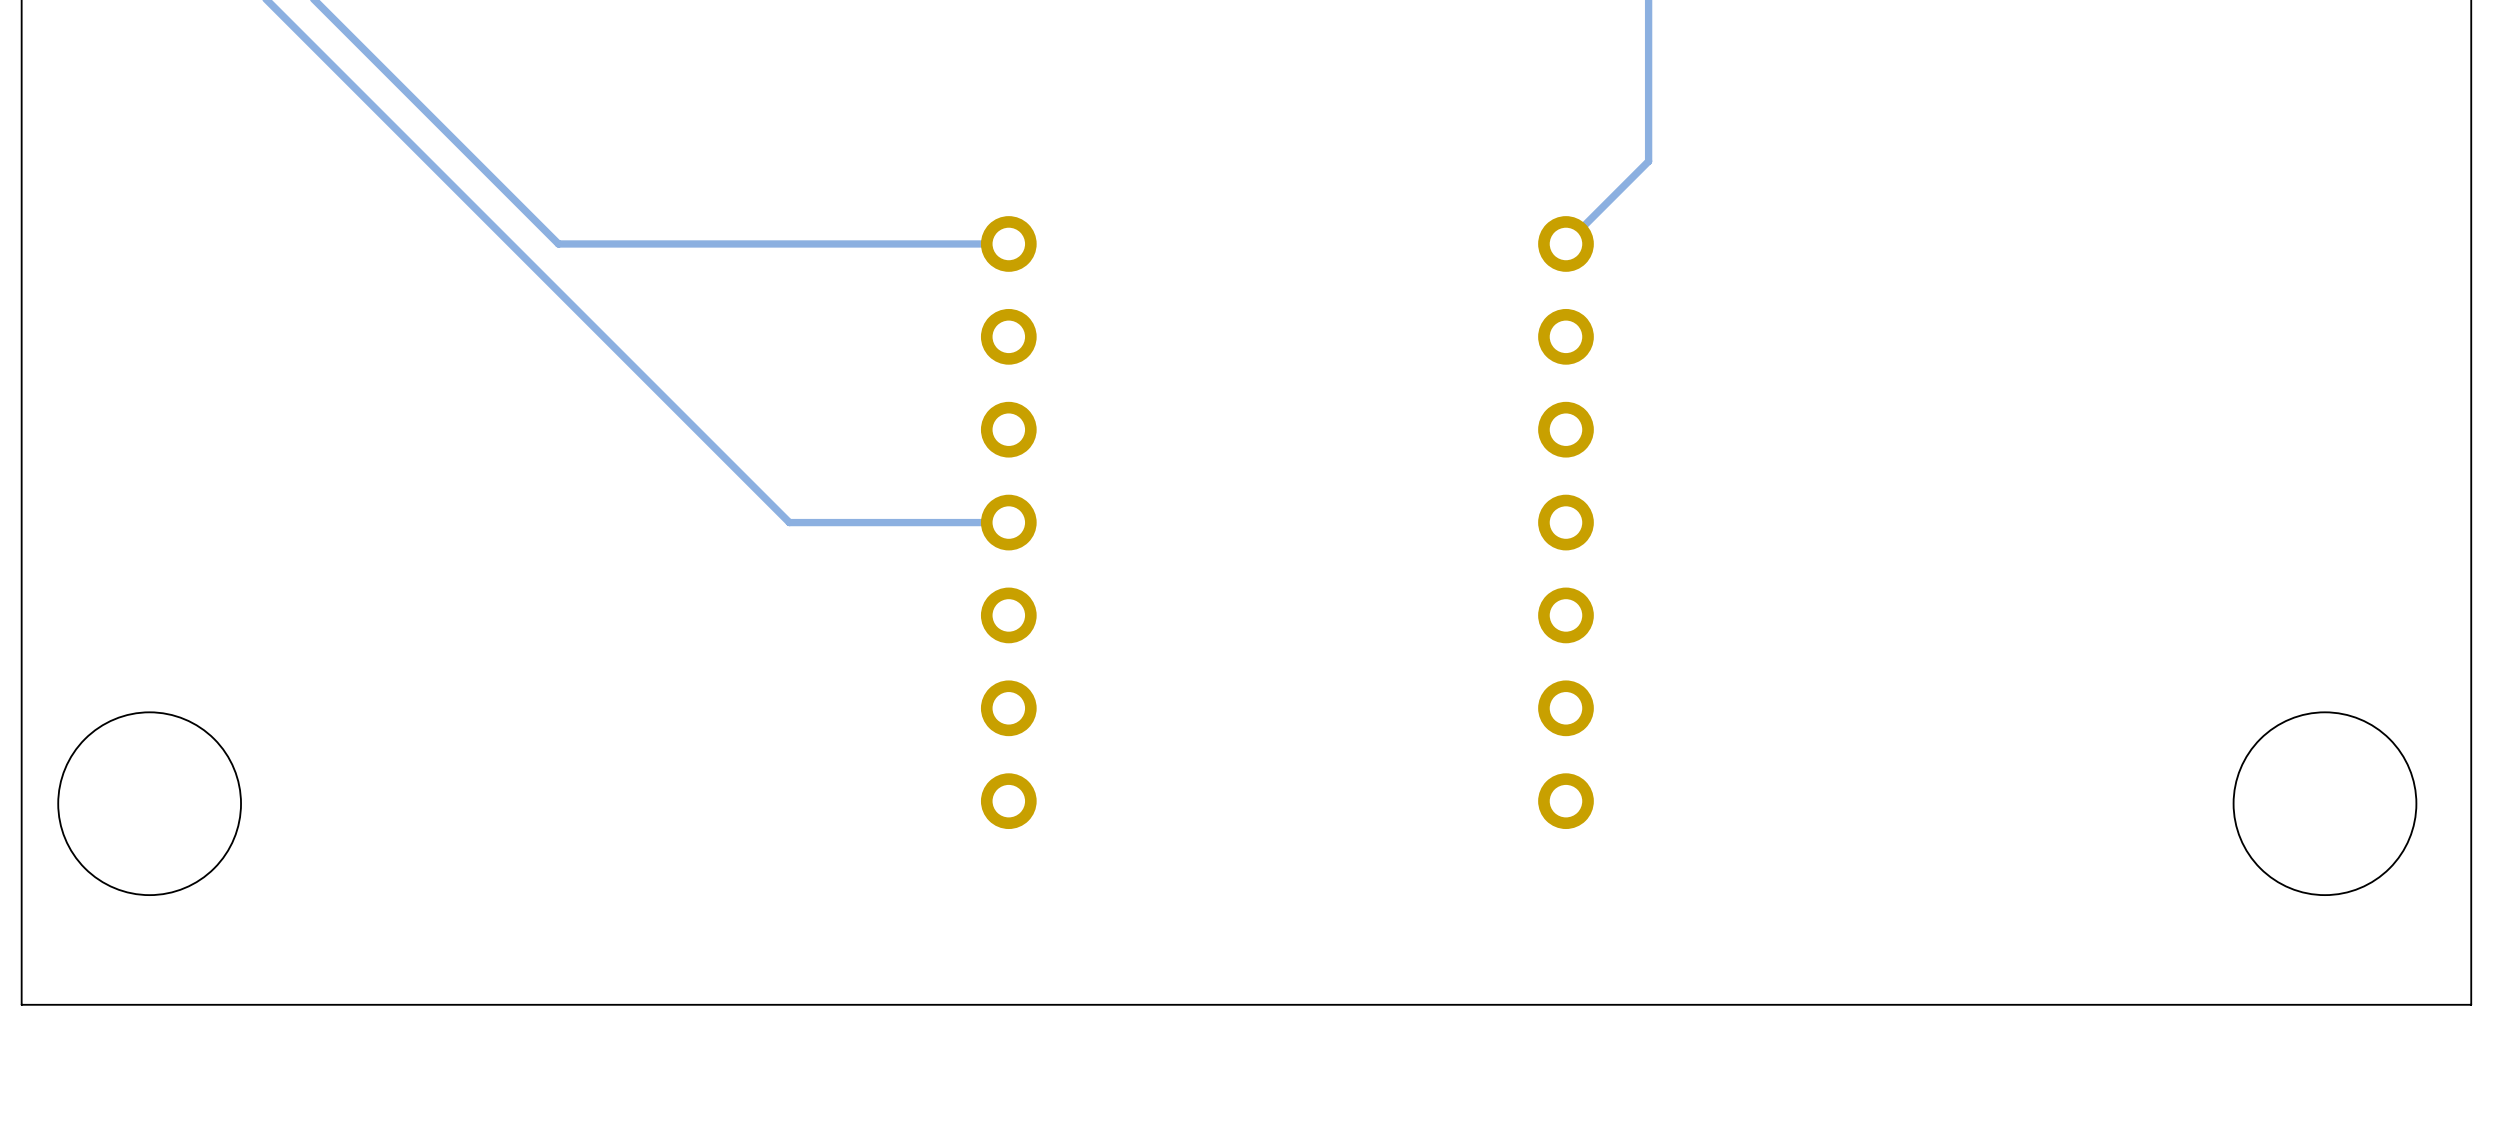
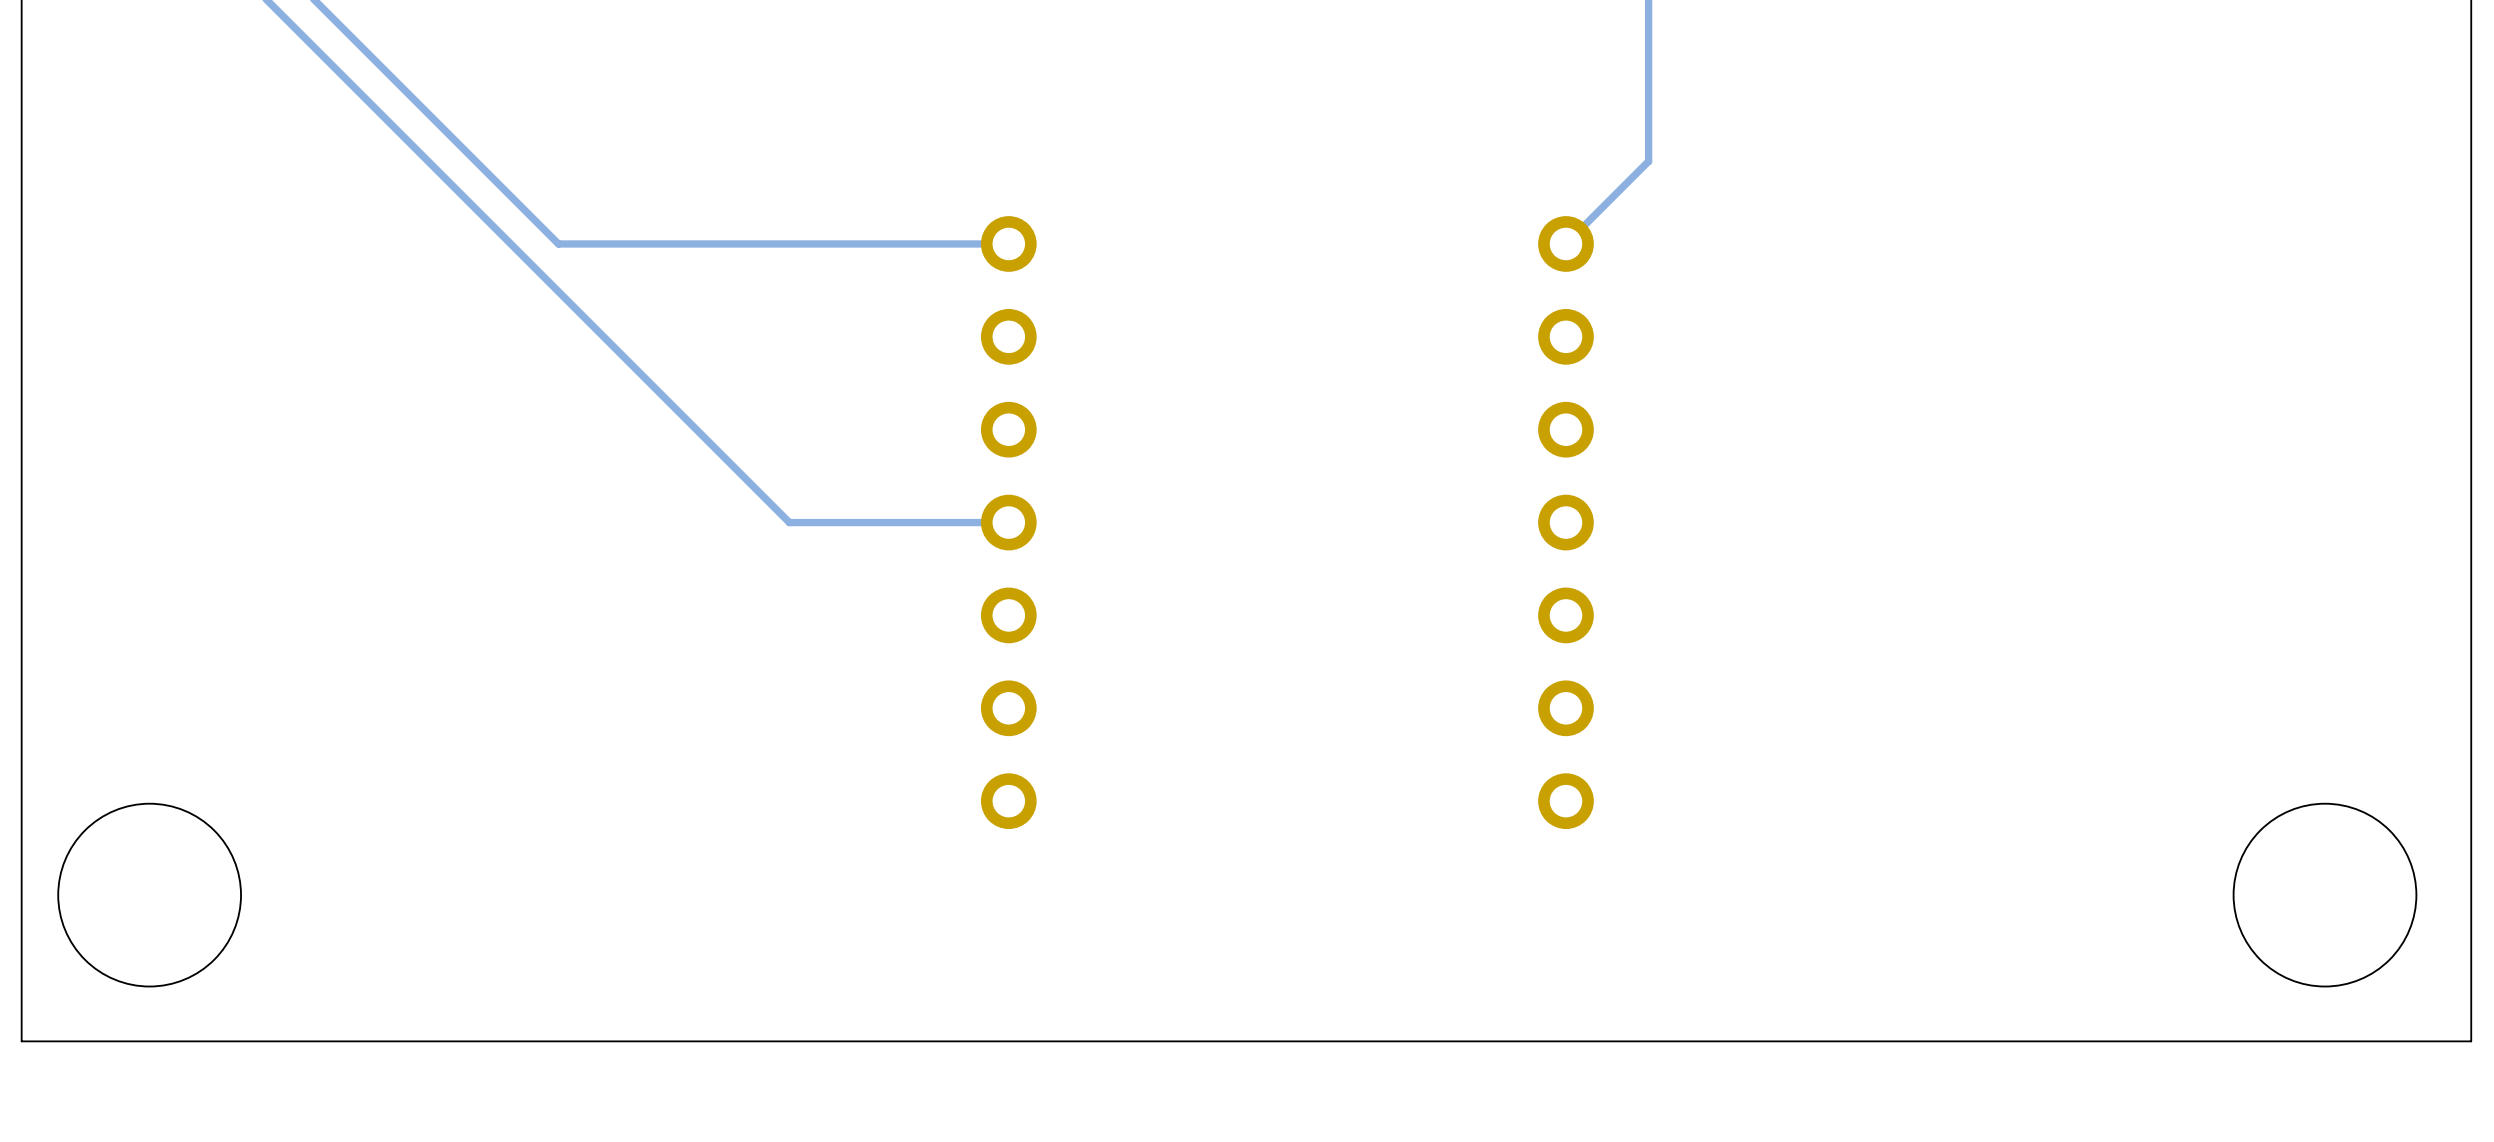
round board edge position: (149, 803) -> (149, 895)
round board edge position: (2324, 803) -> (2324, 895)
board edge: (2471, 1004) (21, 1004) -> (2471, 1004) (2471, 1041) (21, 1041) (21, 1004)

